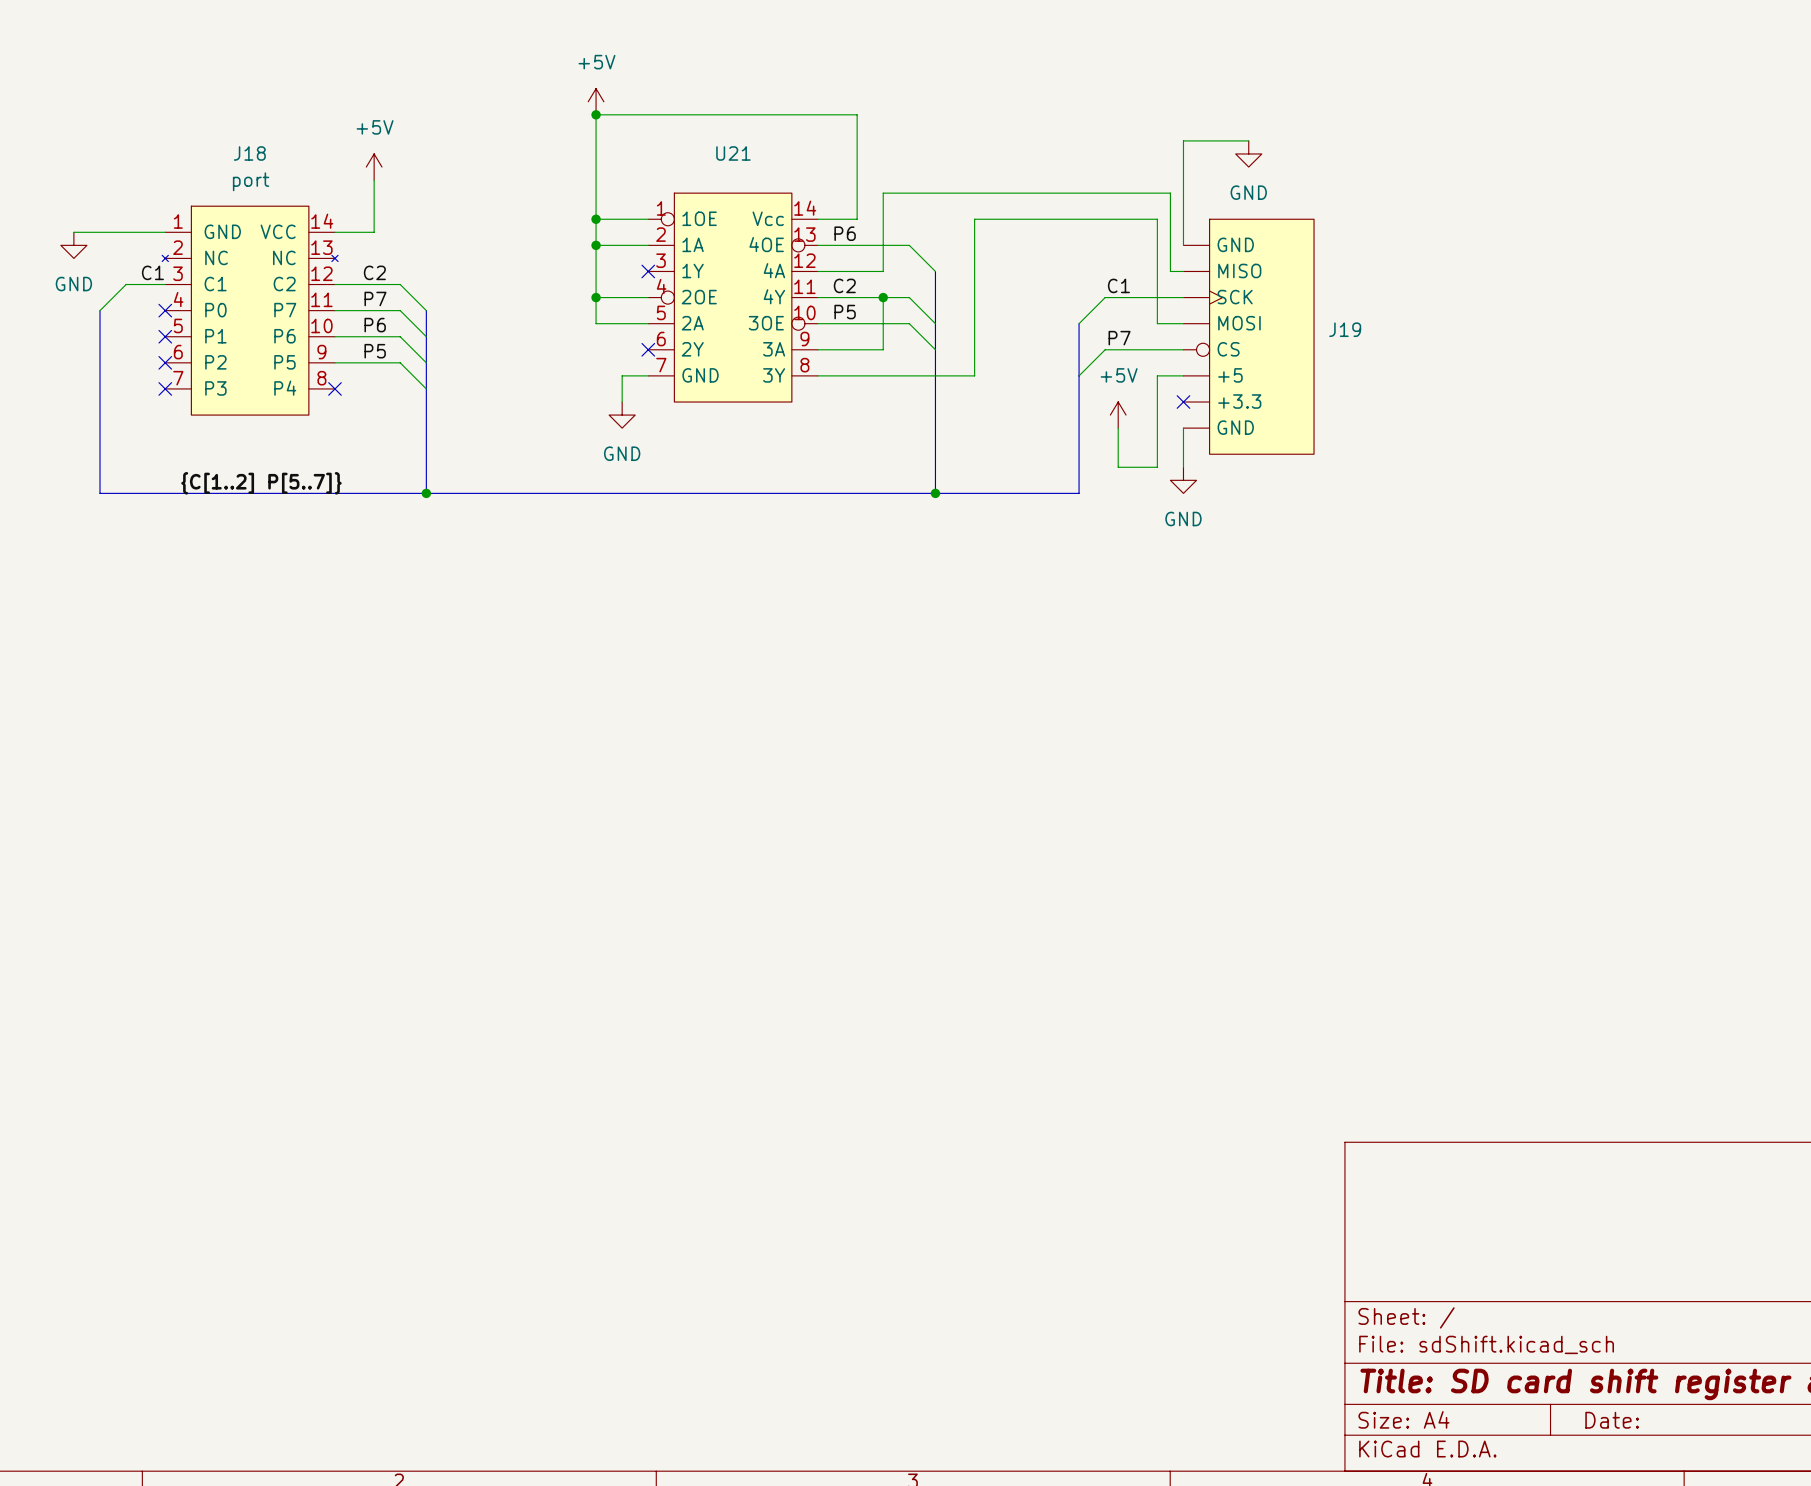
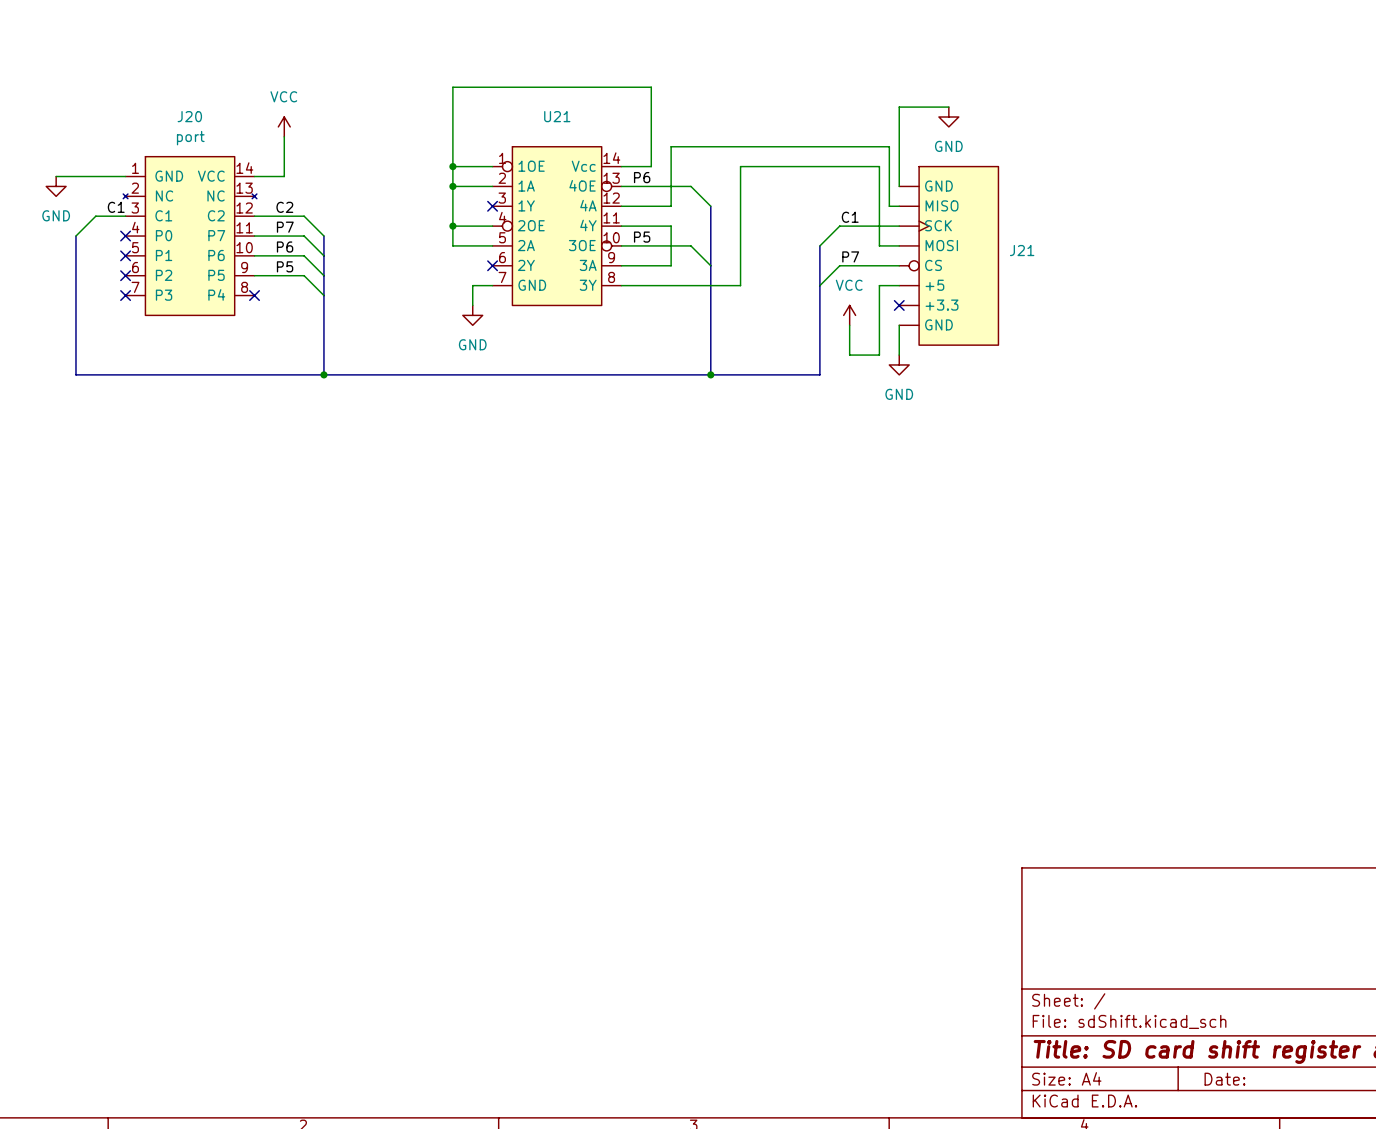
power symbol: +5V (596, 101) -> none
junction: (596, 114) -> none
J18 name: J18 (249, 153) -> J20 (189, 116)
power symbol: +5V (374, 167) -> VCC (284, 126)
label: C2 (844, 285) -> none
wire: (883, 297) (909, 297) (935, 323) -> none
junction: (883, 297) -> none
J19 name: J19 (1345, 329) -> J21 (1022, 250)
power symbol: +5V (1118, 415) -> VCC (849, 315)
label: {C[1..2] P[5..7]} (261, 483) -> none

